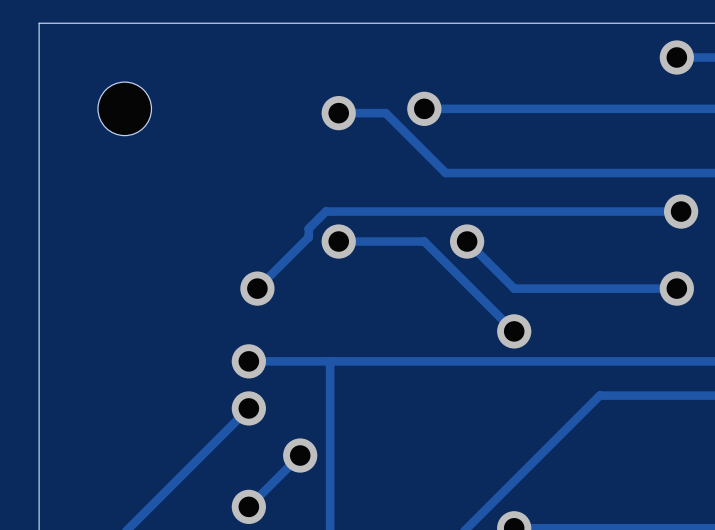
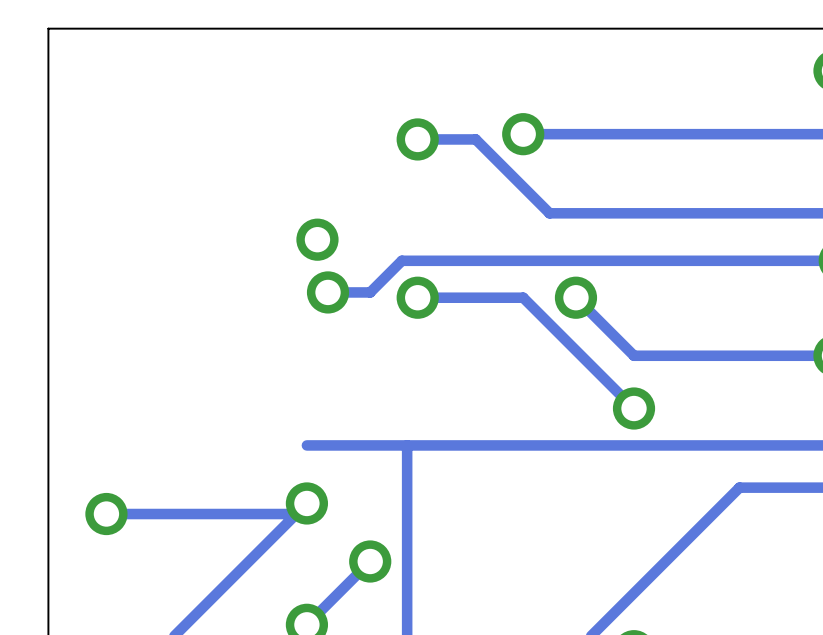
hole: (124, 108) -> none
via: none -> (317, 239)
track: (308, 228) (308, 237) (257, 288) -> (380, 281) (370, 292) (328, 292)
via: none -> (328, 292)
via: (257, 288) -> none
via: (248, 361) -> none
via: none -> (106, 514)
track: none -> (306, 514) (106, 514)

